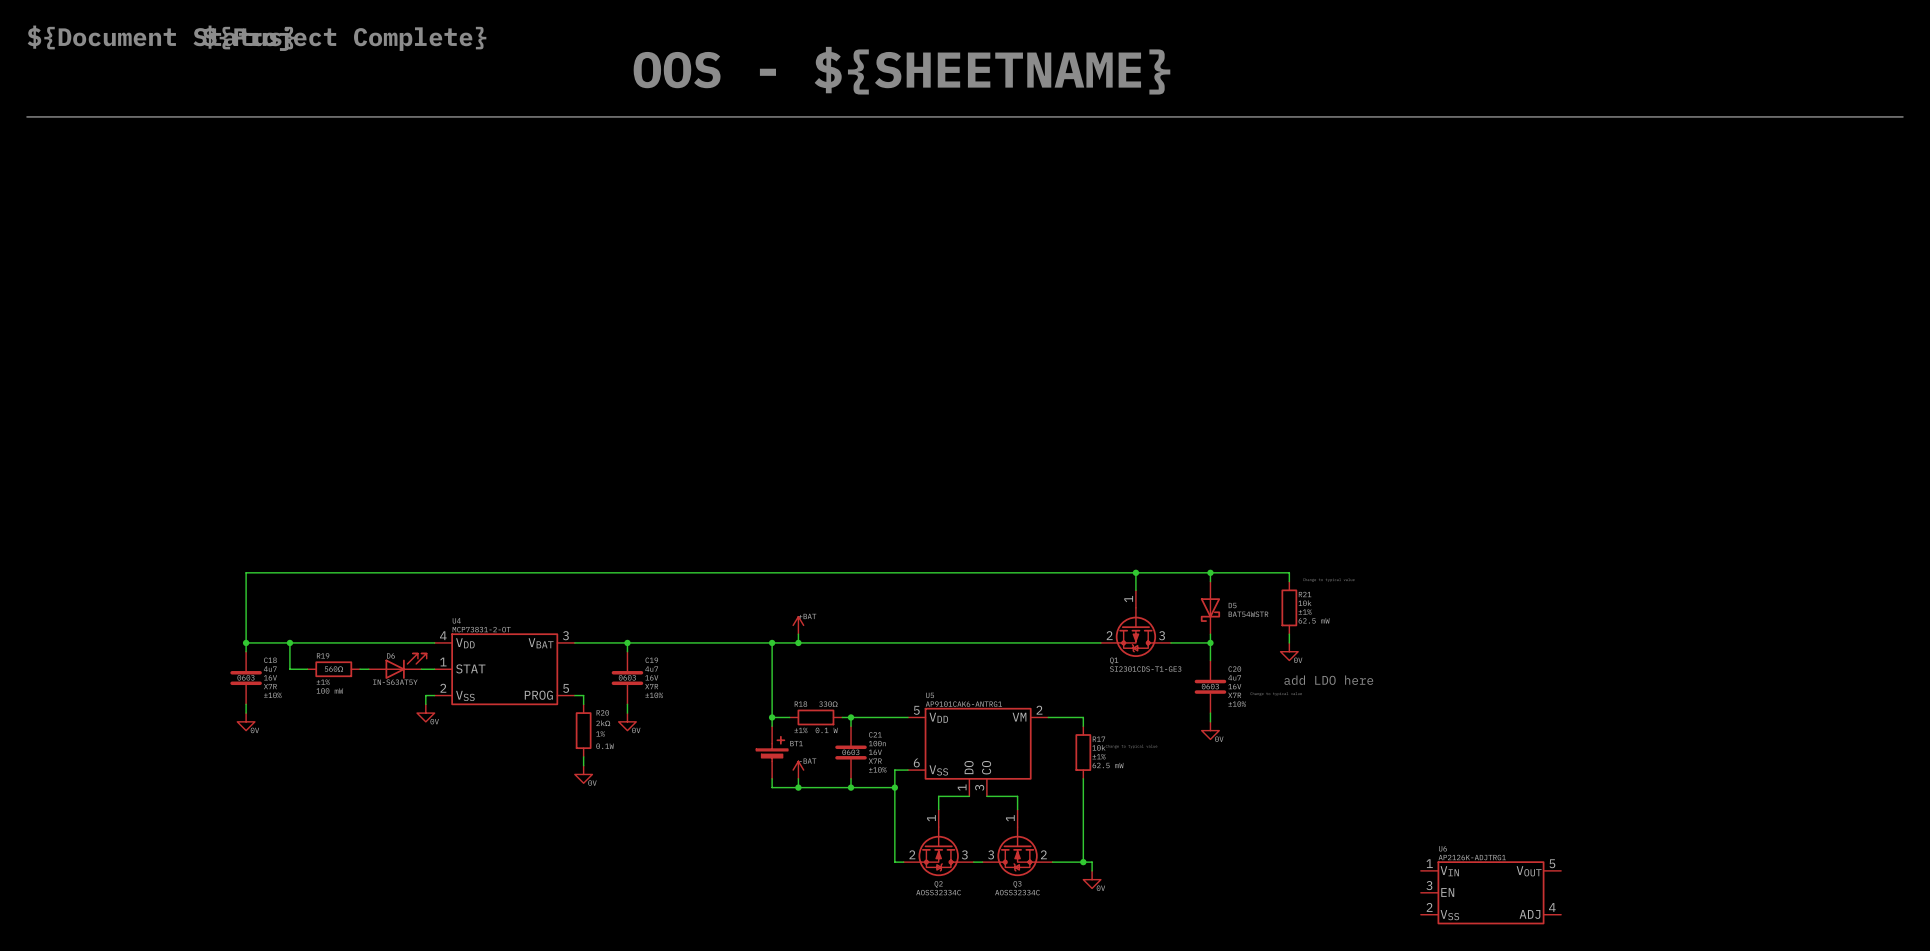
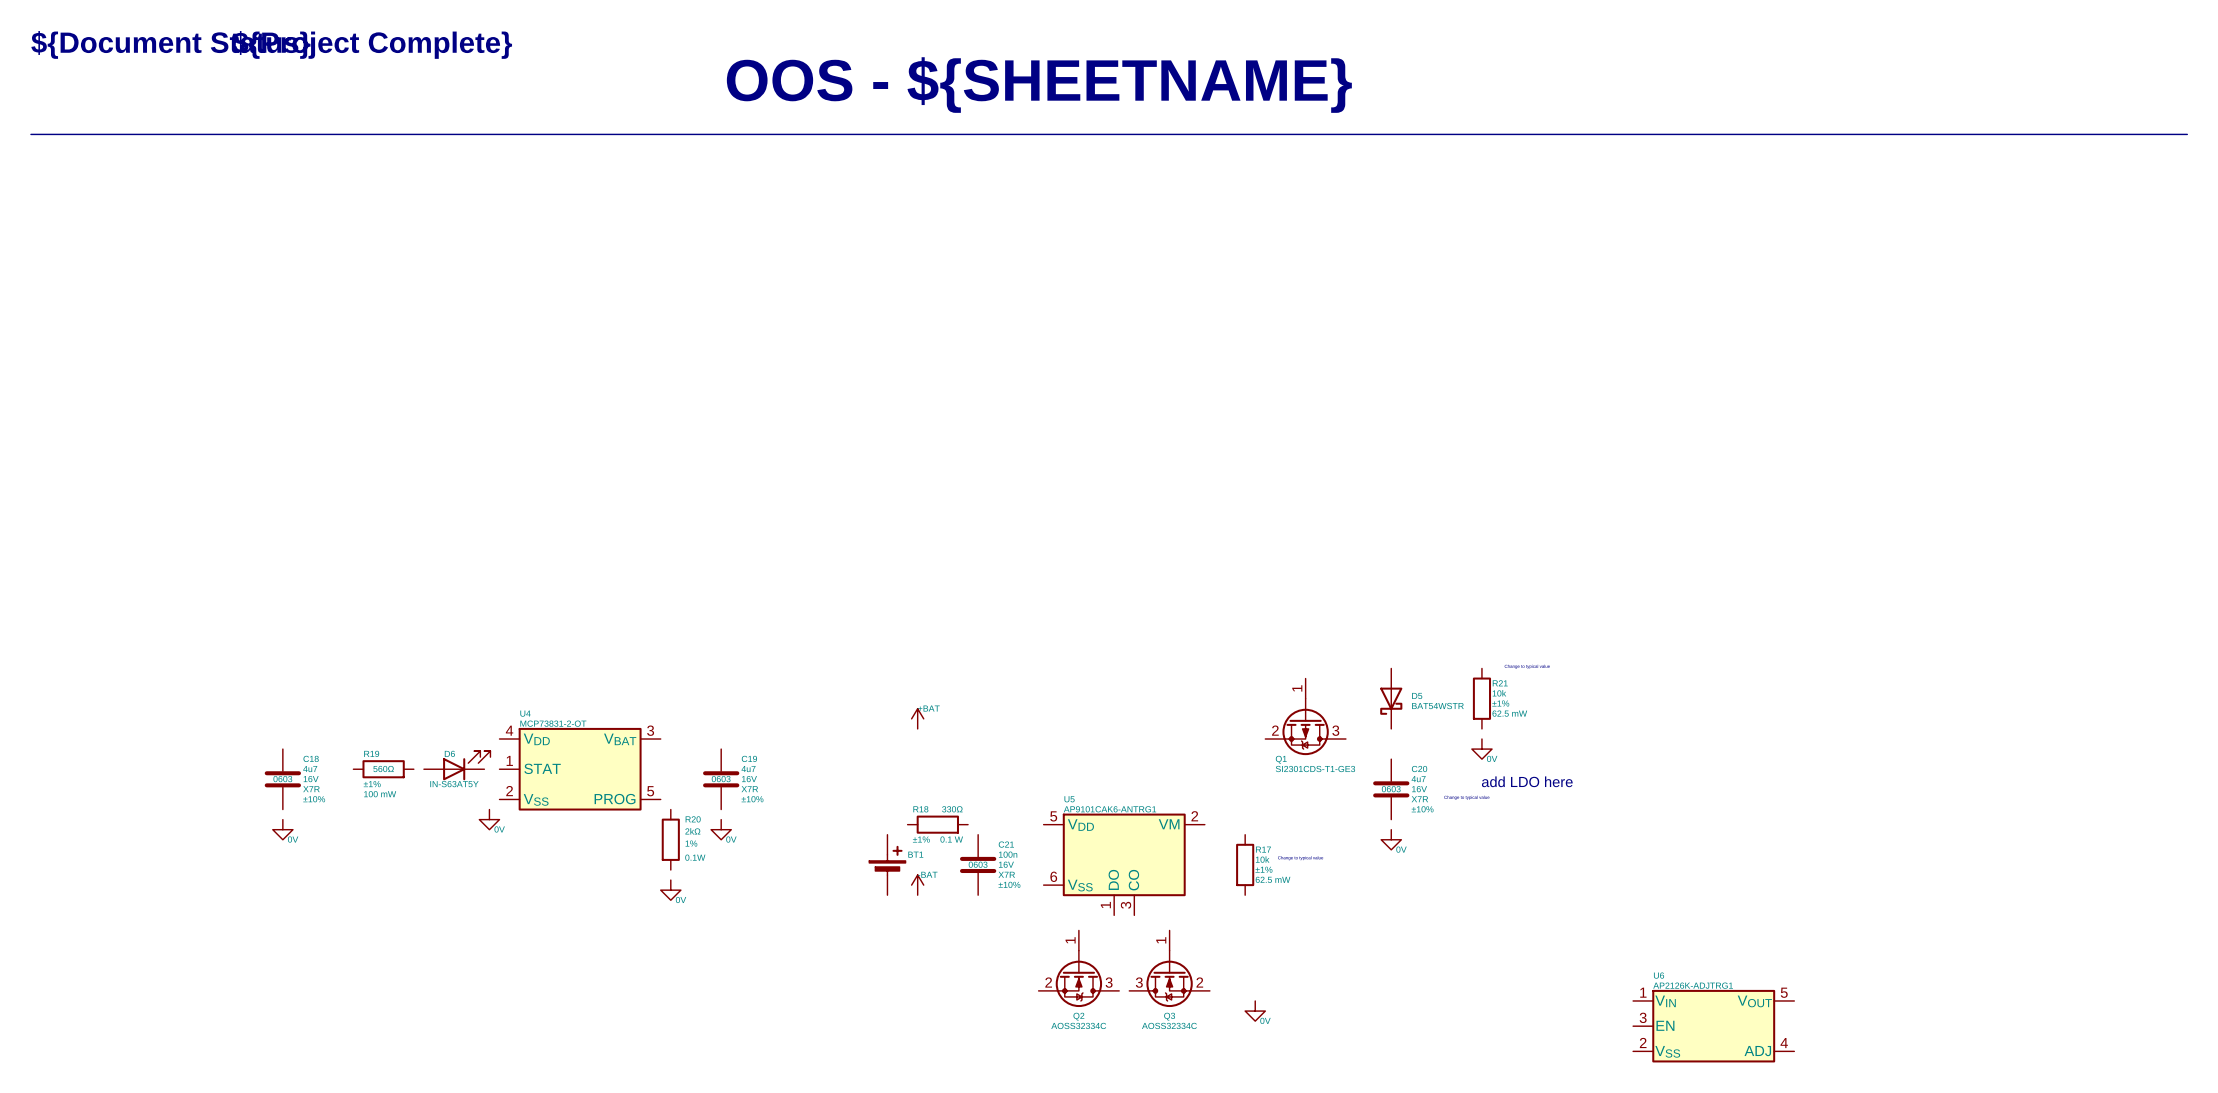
wire: (1135, 572) (1135, 590) -> none
junction: (1135, 572) -> none
wire: (1210, 572) (1210, 581) -> none
junction: (1210, 572) -> none
wire: (1289, 581) (1289, 572) (246, 572) (246, 651) -> none
wire: (798, 634) (798, 642) -> none
wire: (1210, 634) (1210, 660) -> none
wire: (1289, 634) (1289, 642) -> none
wire: (246, 642) (434, 642) -> none
junction: (246, 642) -> none
wire: (289, 642) (289, 669) (307, 669) -> none
junction: (289, 642) -> none
wire: (574, 642) (1100, 642) -> none
wire: (627, 642) (627, 651) -> none
junction: (627, 642) -> none
wire: (772, 642) (772, 726) -> none
junction: (772, 642) -> none
junction: (798, 642) -> none
wire: (1171, 642) (1210, 642) -> none
junction: (1210, 642) -> none
wire: (360, 669) (368, 669) -> none
wire: (421, 669) (434, 669) -> none
wire: (434, 695) (425, 695) (425, 704) -> none
wire: (574, 695) (583, 695) (583, 704) -> none
wire: (246, 704) (246, 713) -> none
wire: (627, 704) (627, 713) -> none
wire: (1210, 713) (1210, 721) -> none
wire: (772, 717) (789, 717) -> none
junction: (772, 717) -> none
wire: (842, 717) (907, 717) -> none
wire: (851, 717) (851, 726) -> none
junction: (851, 717) -> none
wire: (1048, 717) (1083, 717) (1083, 726) -> none
wire: (583, 756) (583, 765) -> none
wire: (907, 770) (894, 770) (894, 862) (903, 862) -> none
wire: (772, 778) (772, 787) (894, 787) -> none
wire: (798, 778) (798, 787) -> none
wire: (851, 778) (851, 787) -> none
wire: (1083, 778) (1083, 862) -> none
junction: (798, 787) -> none
junction: (851, 787) -> none
junction: (894, 787) -> none
wire: (969, 796) (938, 796) (938, 809) -> none
wire: (986, 796) (1017, 796) (1017, 809) -> none
wire: (973, 862) (982, 862) -> none
wire: (1052, 862) (1092, 862) (1092, 870) -> none
junction: (1083, 862) -> none

